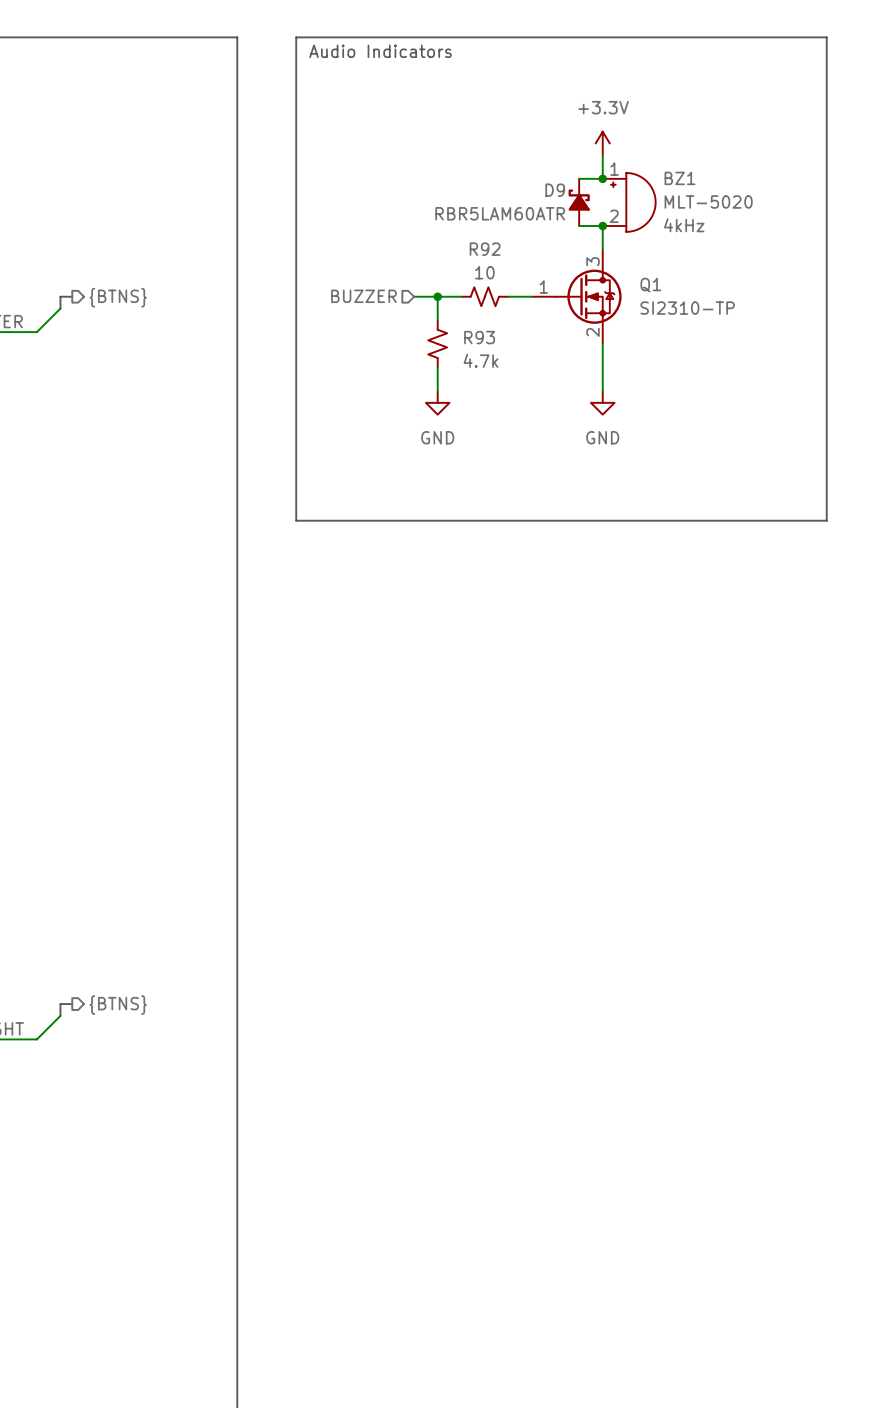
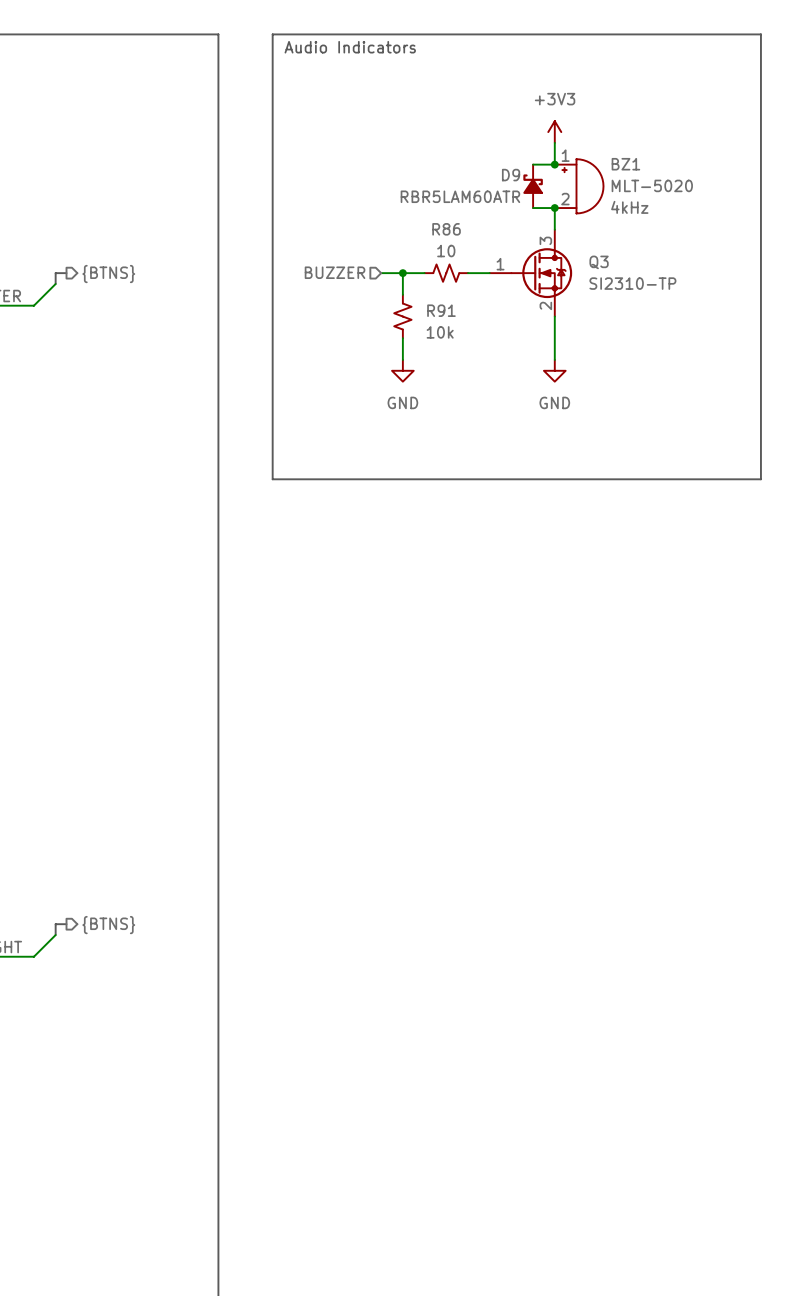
power symbol: +3.3V (602, 143) -> +3V3 (554, 132)
R92 name: R92 (485, 249) -> R86 (446, 229)
Q1 name: Q1 (650, 285) -> Q3 (599, 262)
R93 name: R93 (479, 337) -> R91 (441, 310)
R93 value: 4.7k (481, 360) -> 10k (440, 332)

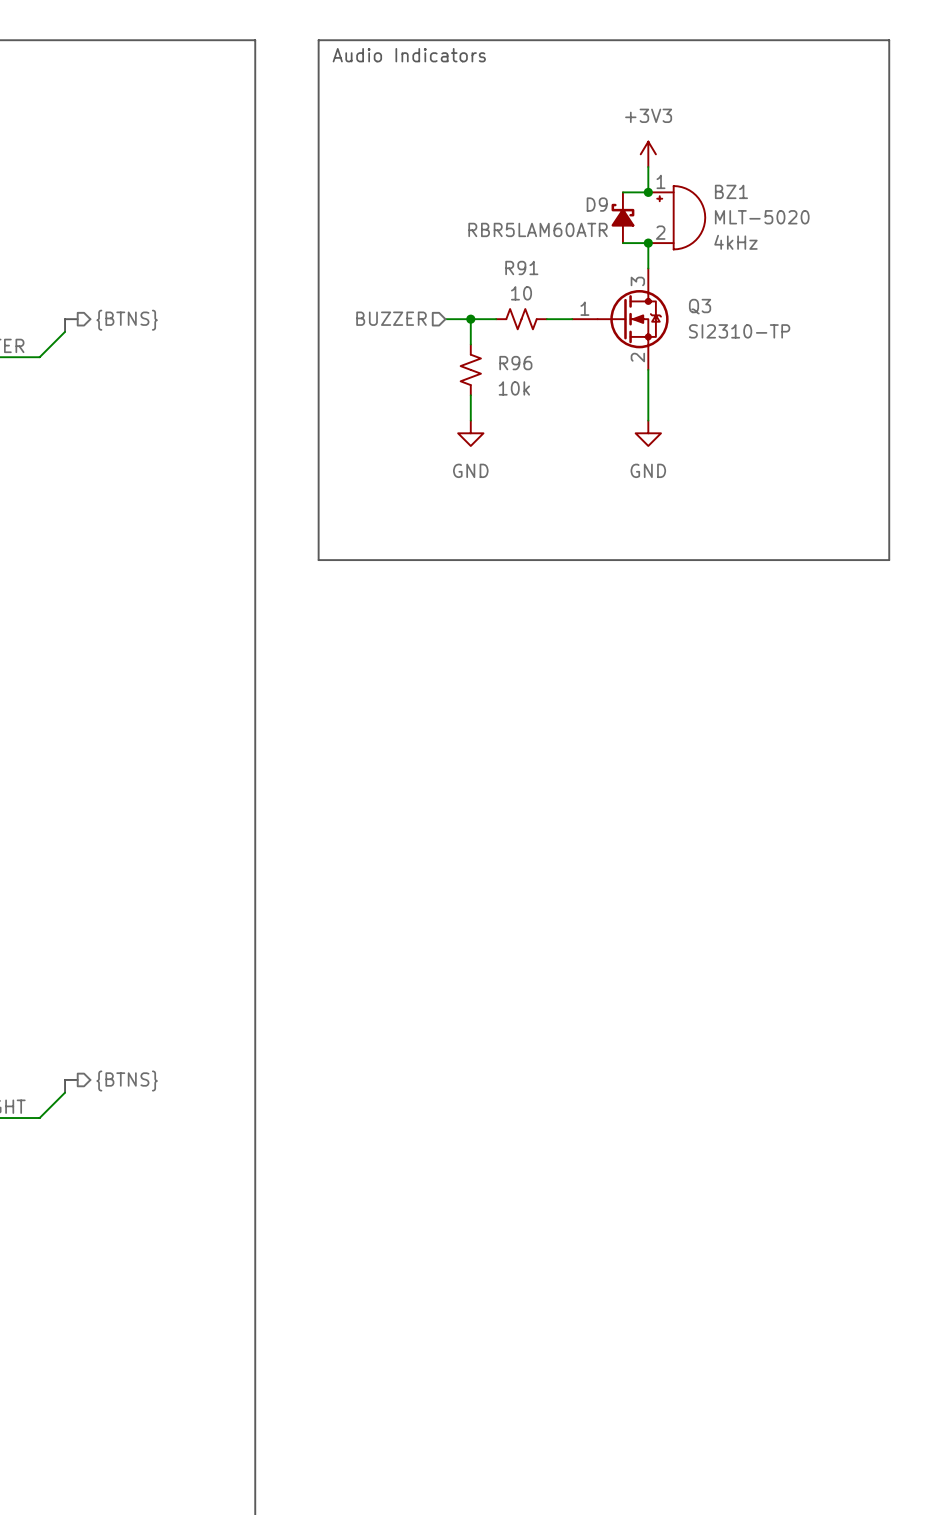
R86 name: R86 (446, 229) -> R91 (521, 267)
R91 name: R91 (441, 310) -> R96 (515, 363)

